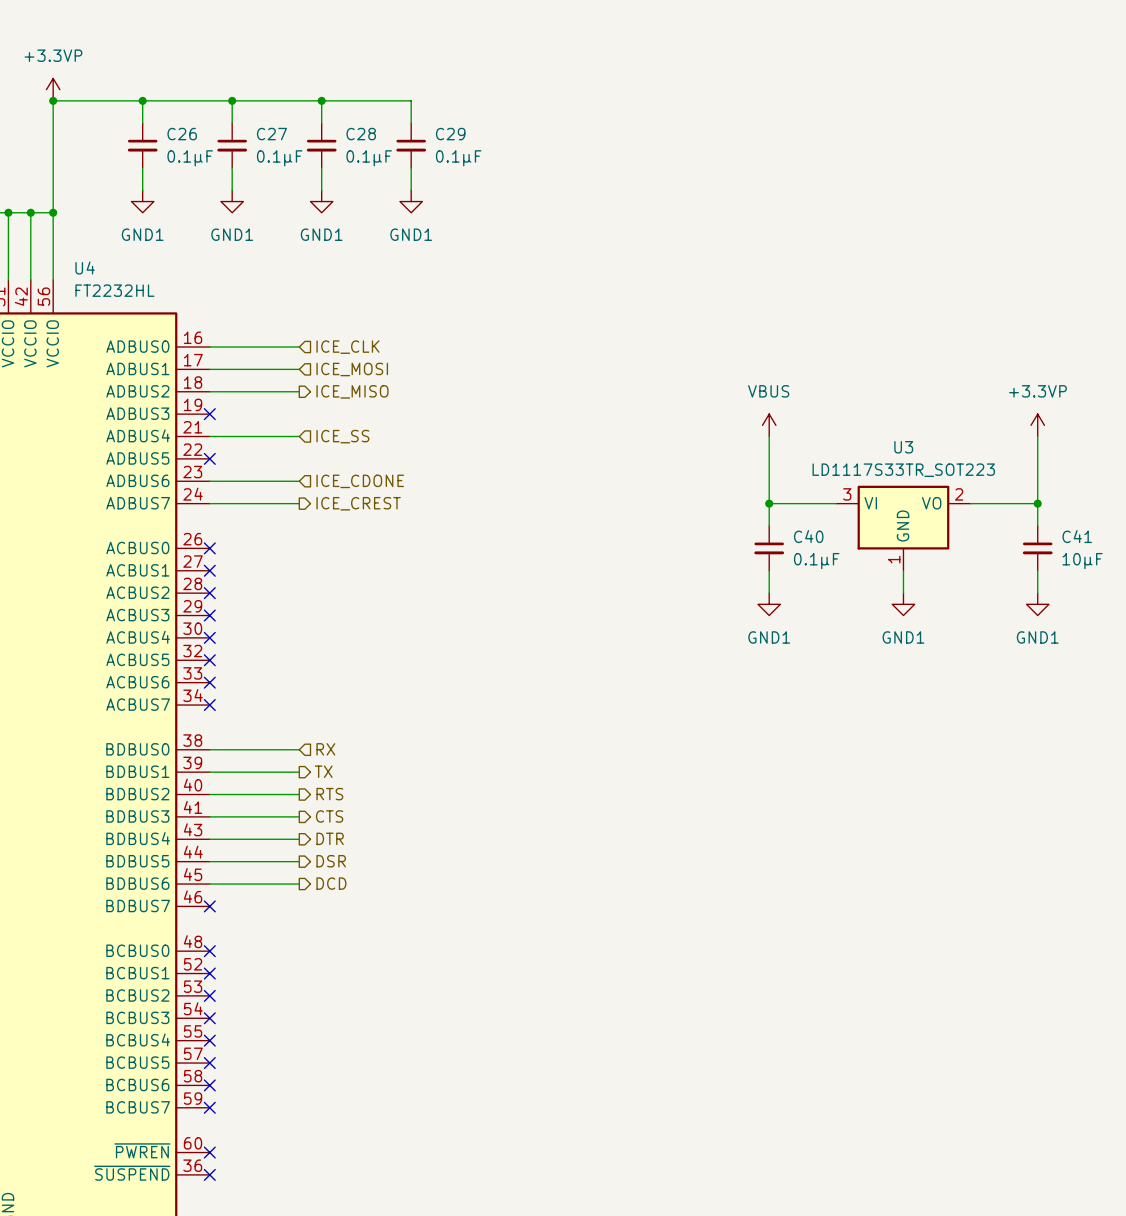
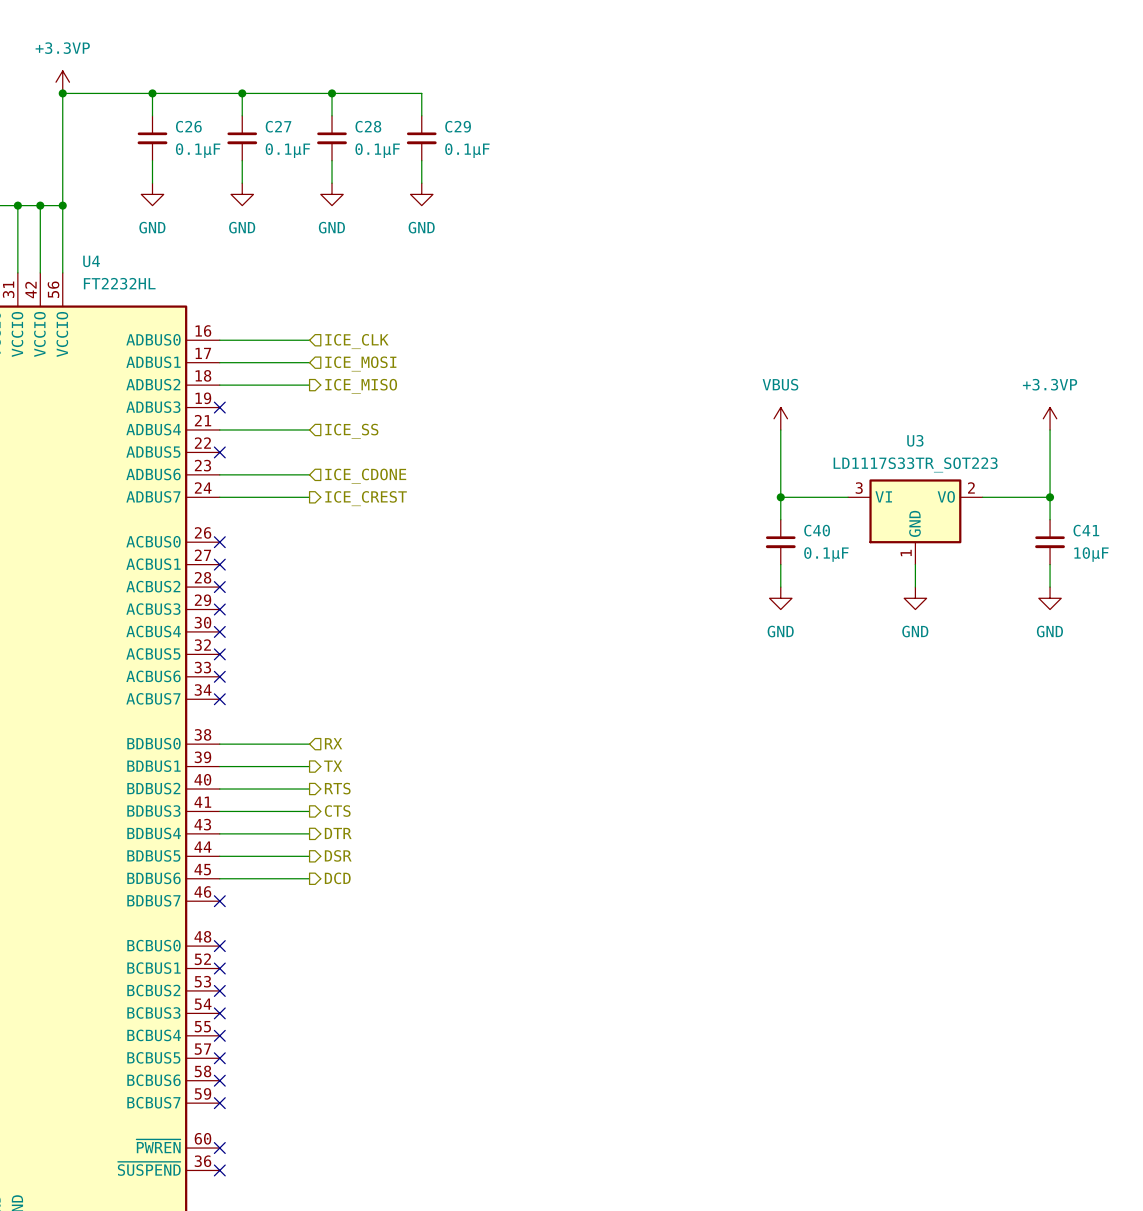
power symbol: GND1 (142, 201) -> GND (152, 194)
power symbol: GND1 (232, 201) -> GND (242, 194)
power symbol: GND1 (321, 201) -> GND (332, 194)
power symbol: GND1 (411, 201) -> GND (421, 194)
power symbol: GND1 (769, 604) -> GND (780, 598)
power symbol: GND1 (903, 604) -> GND (915, 598)
power symbol: GND1 (1037, 604) -> GND (1050, 598)

